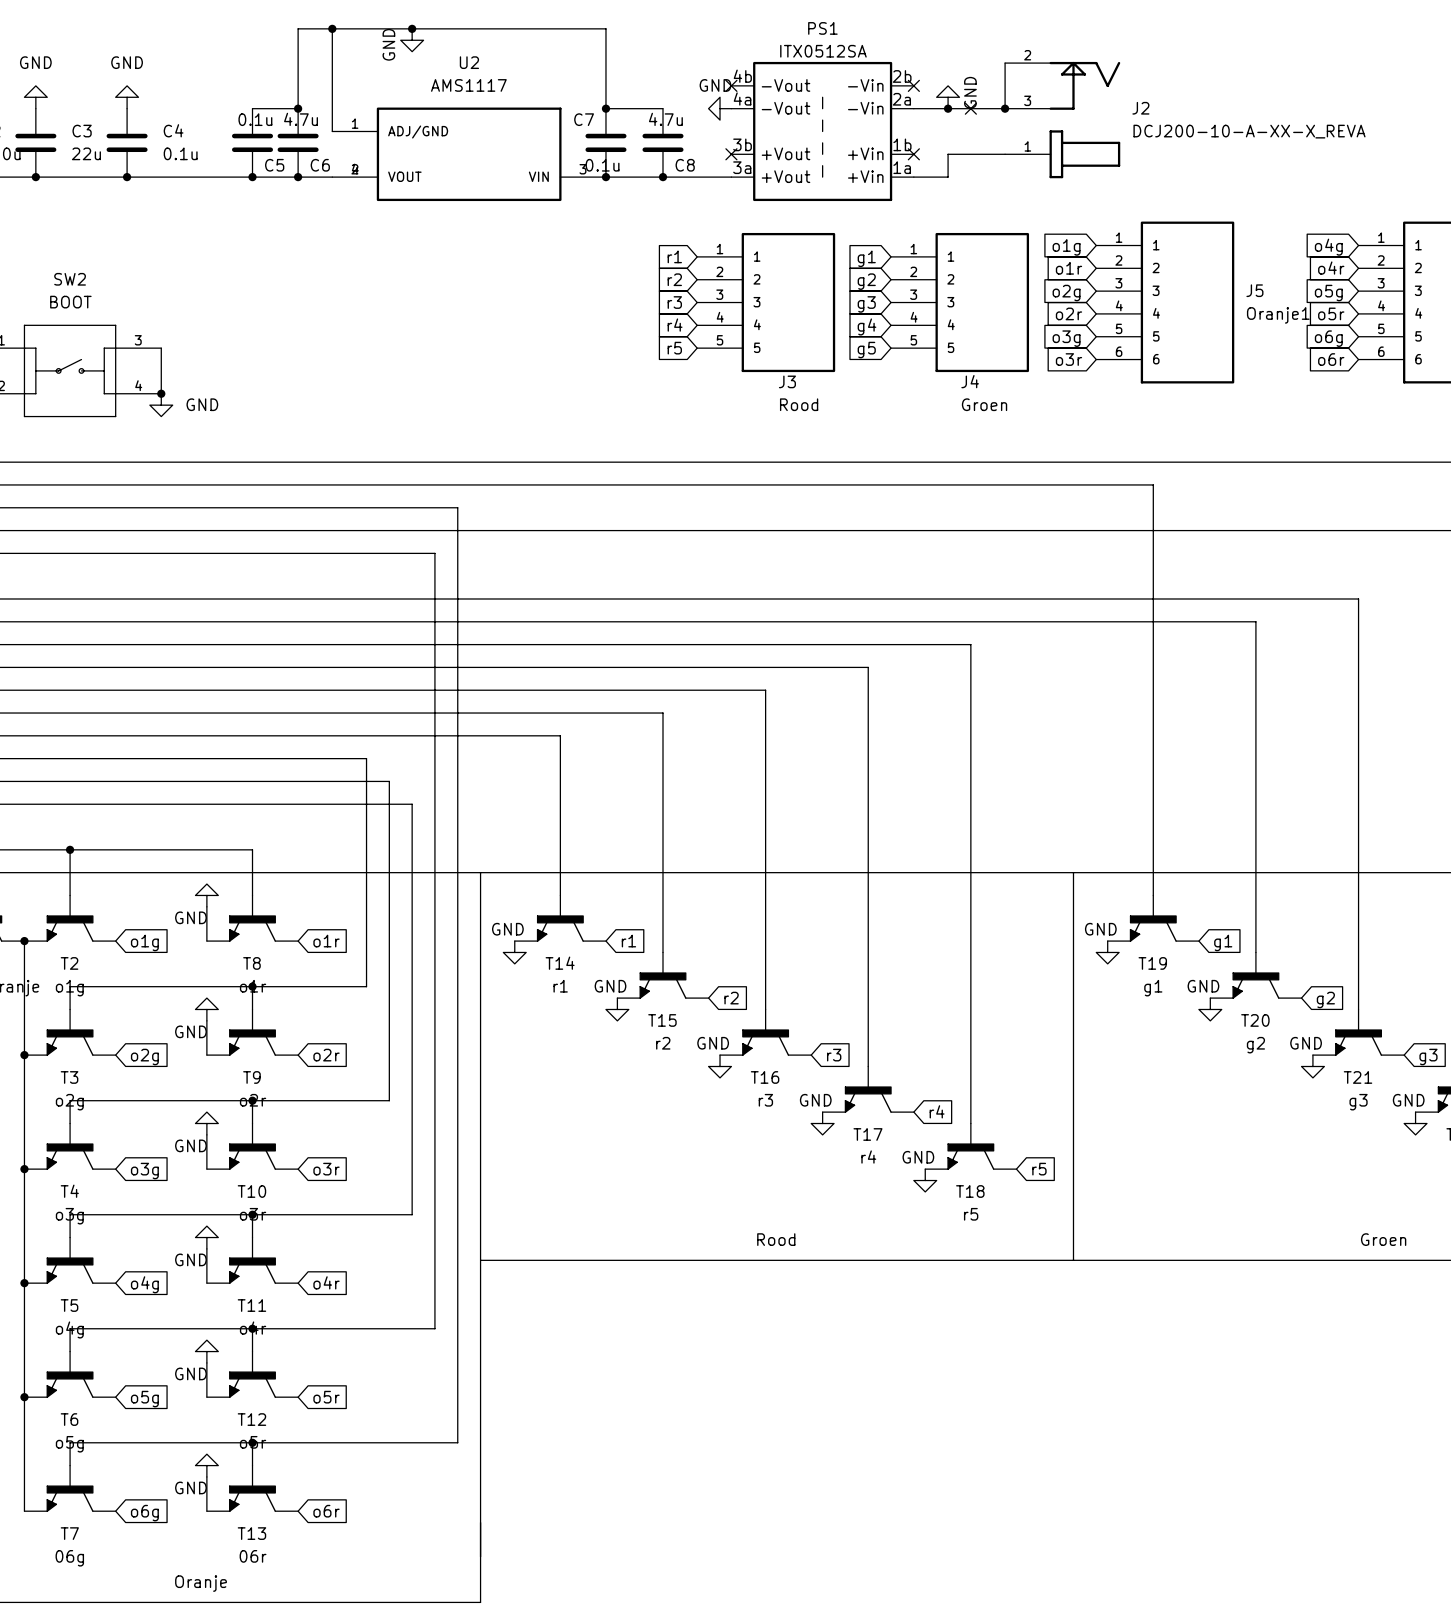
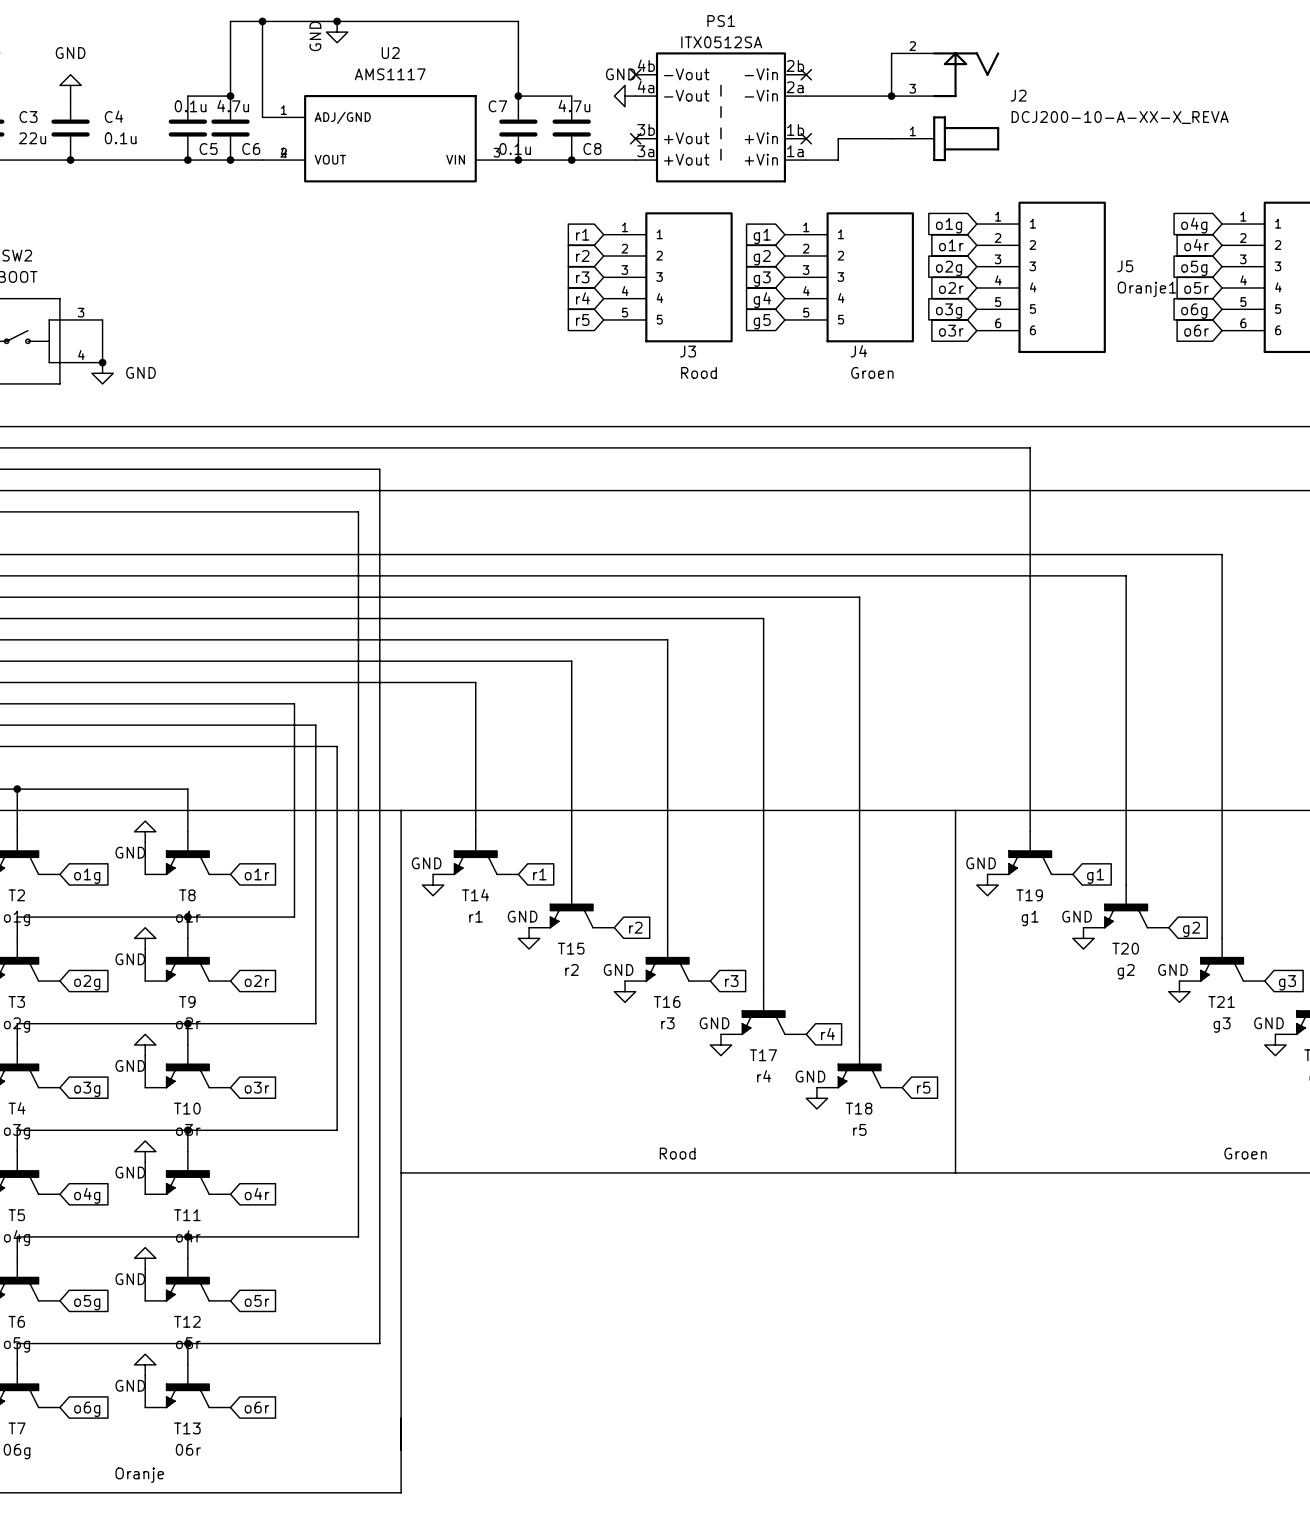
power symbol: GND (948, 97) -> none
junction: (948, 108) -> none
no-connect mark: (970, 108) -> none

